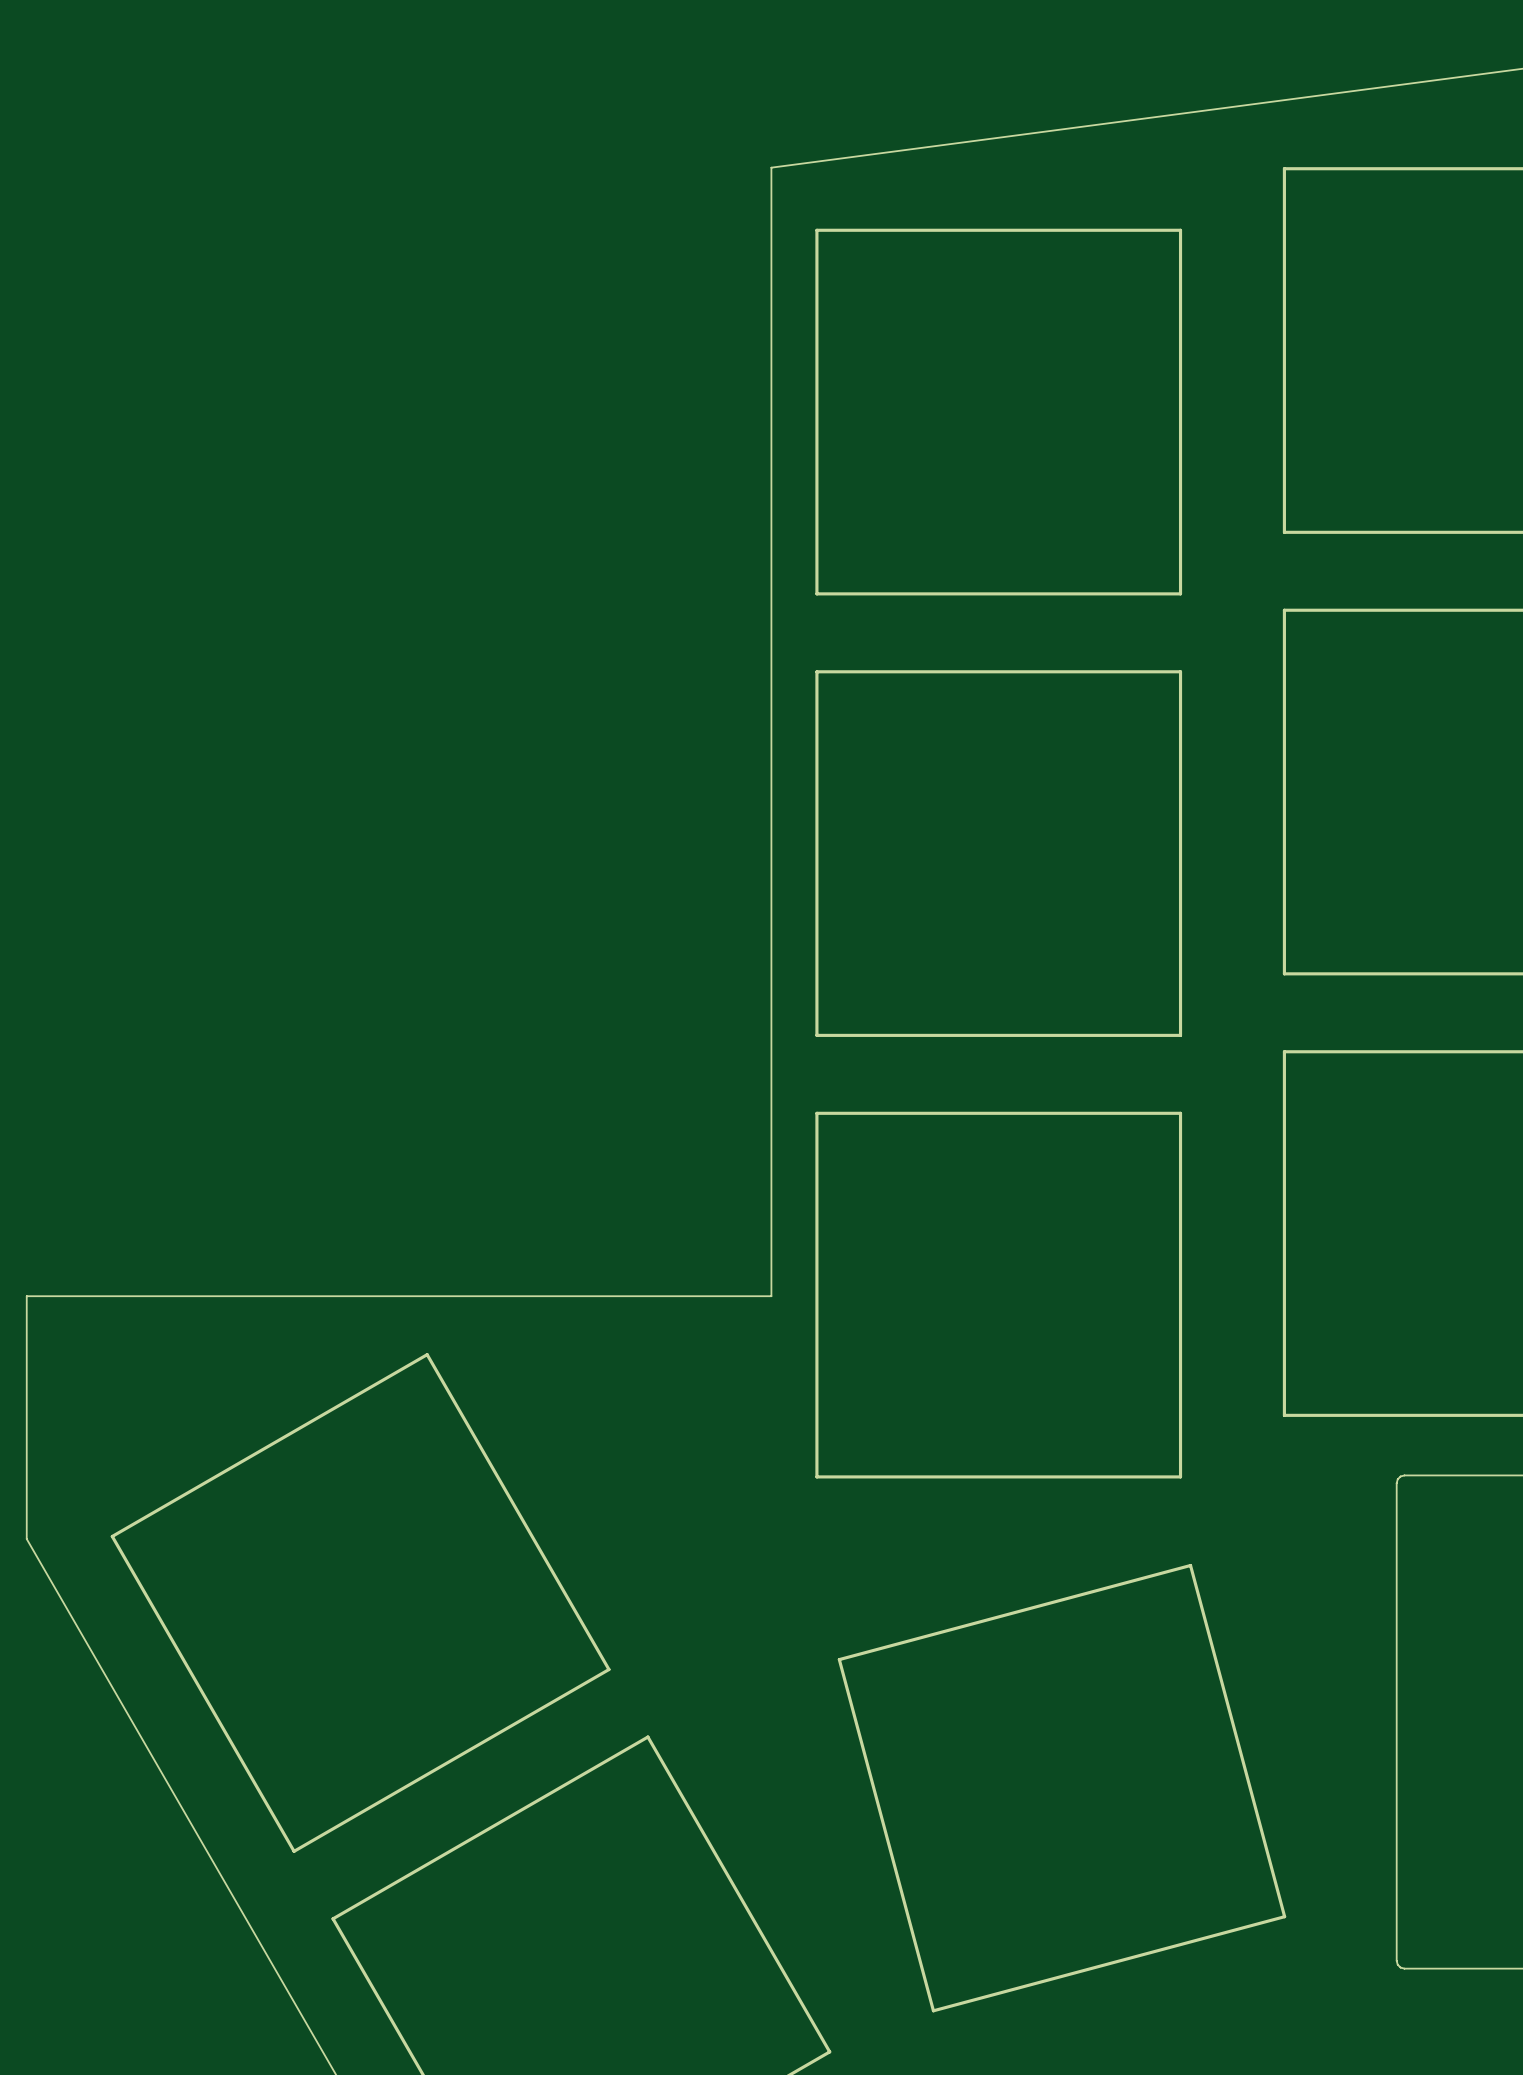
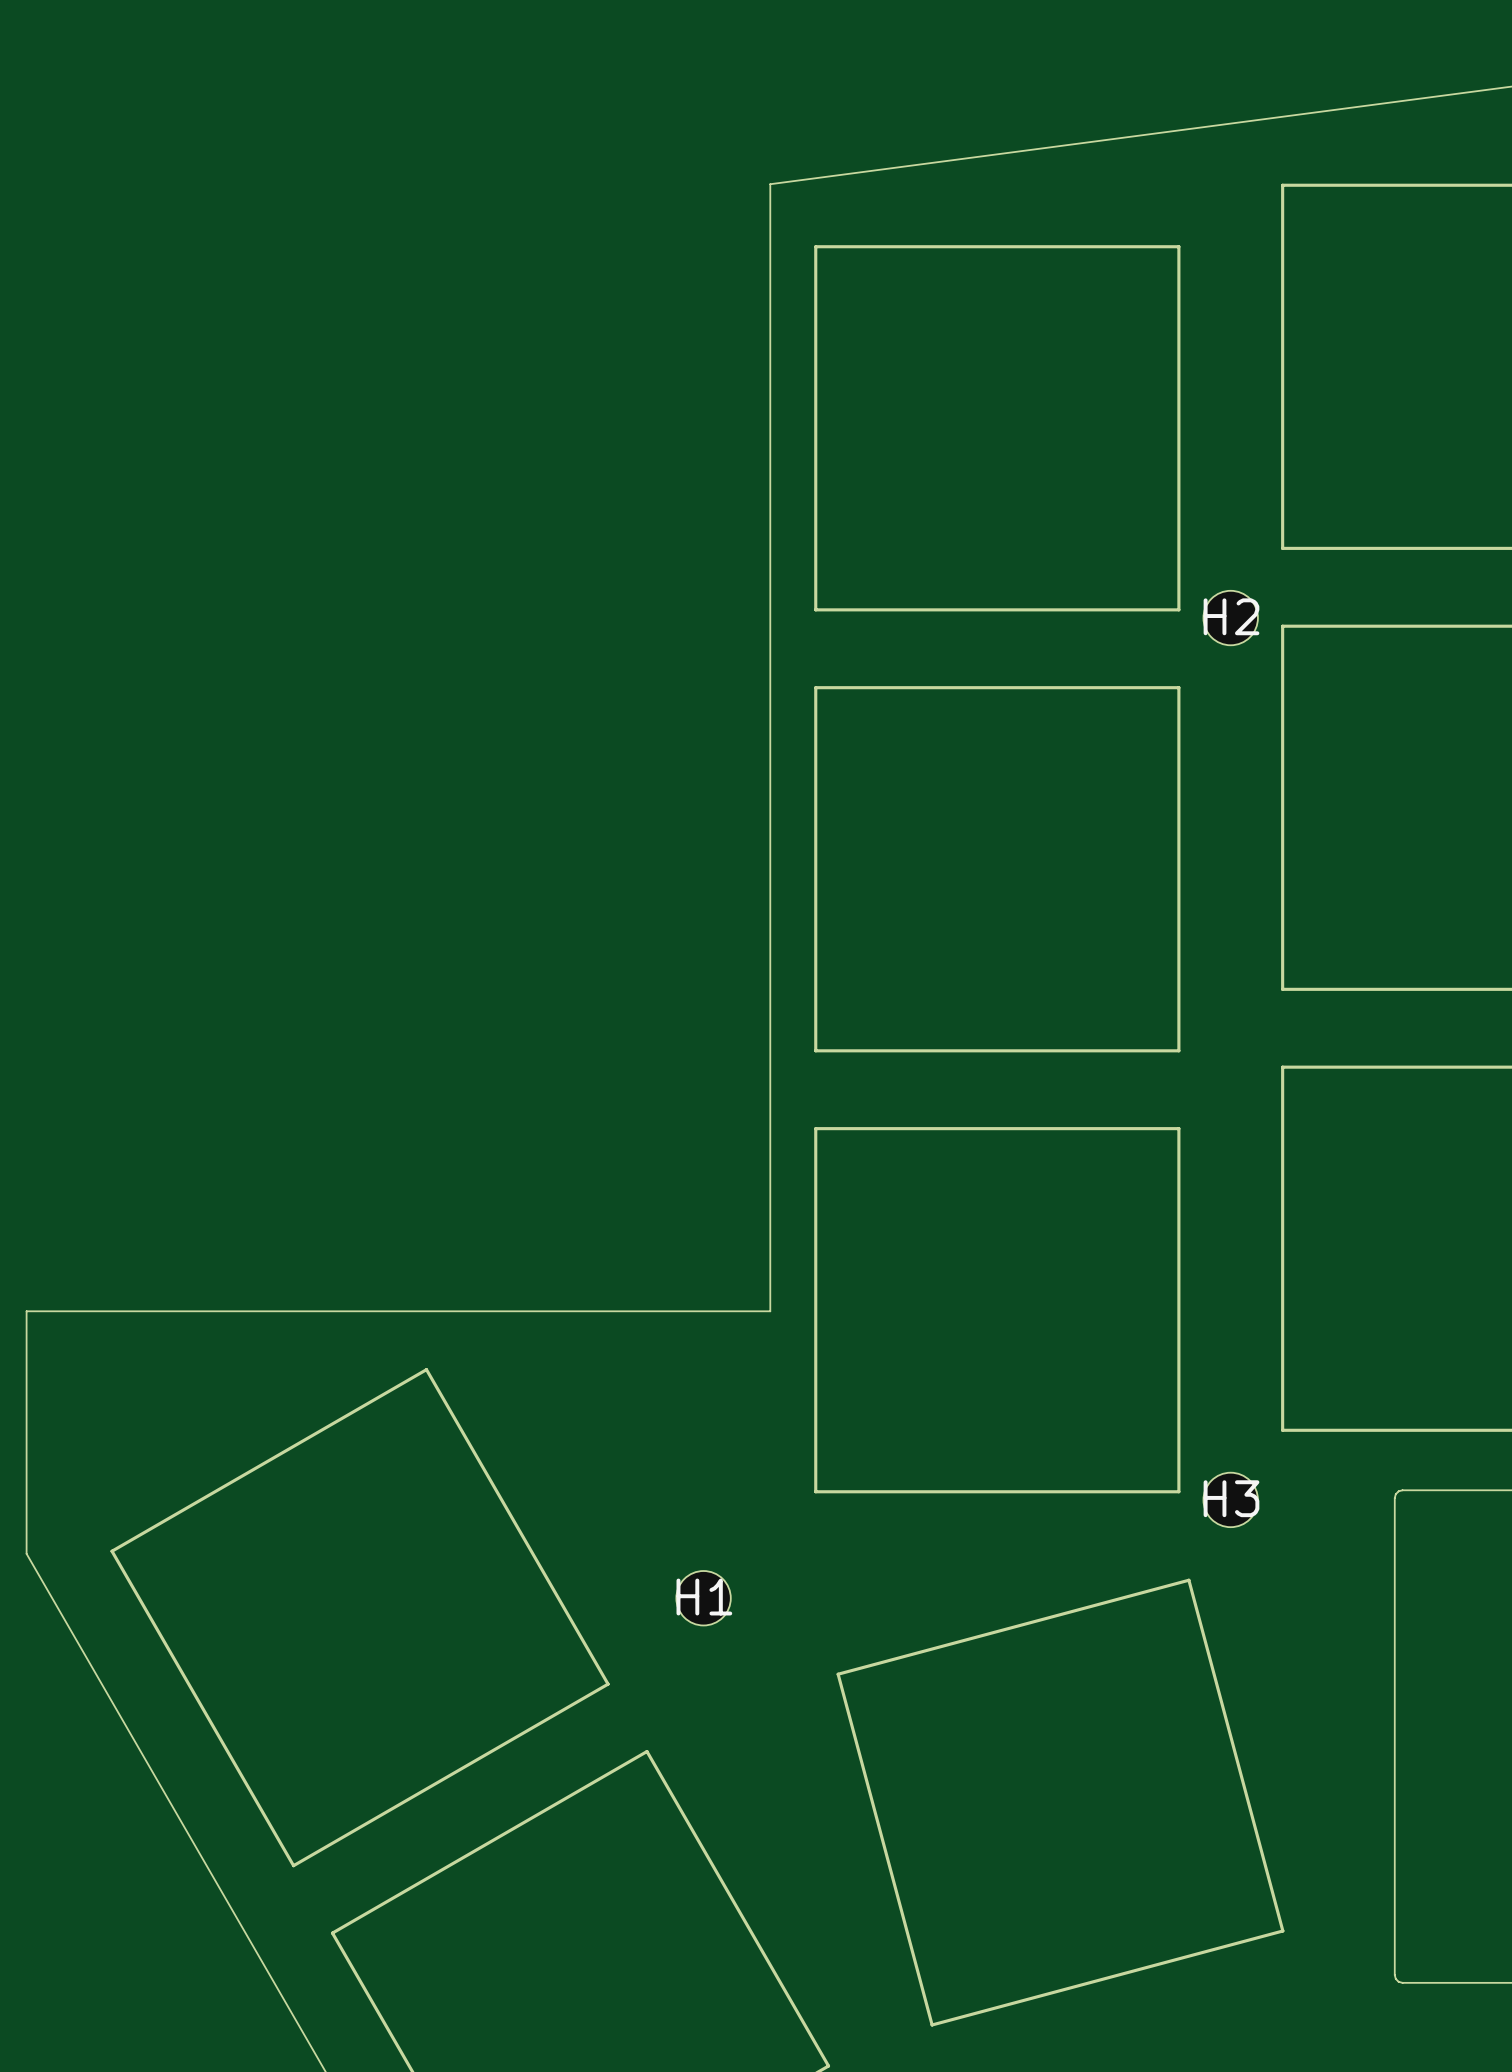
H2: none -> (1230, 618)
H3: none -> (1230, 1499)
H1: none -> (703, 1598)

